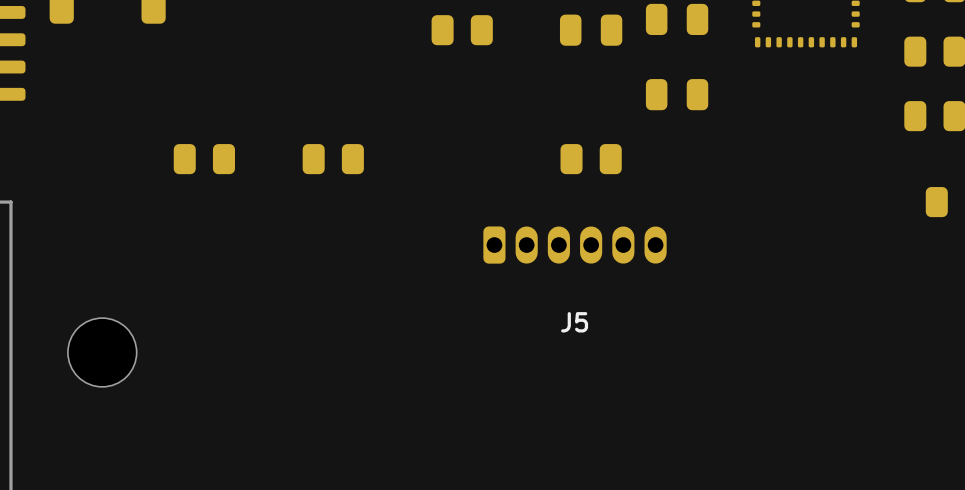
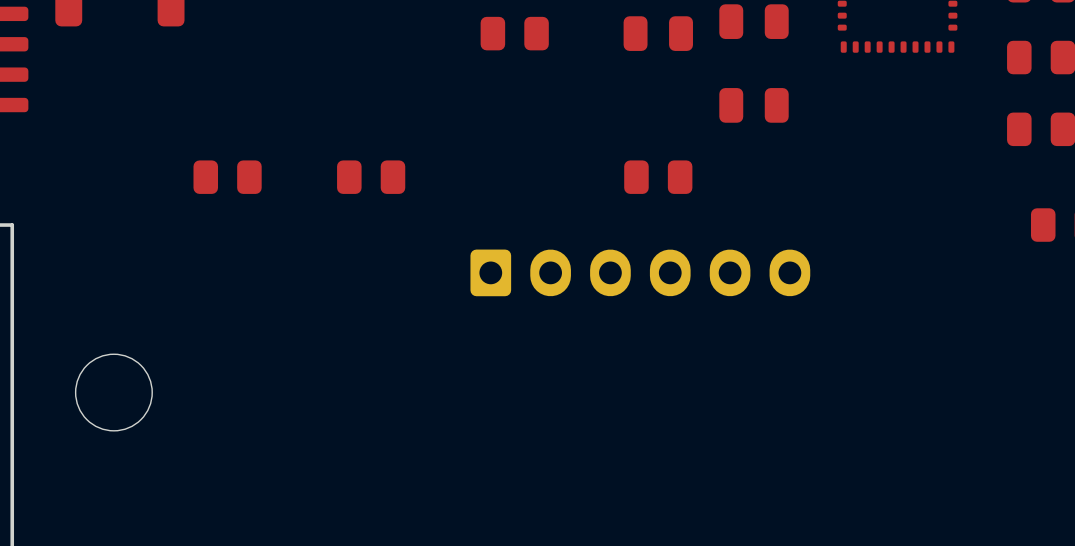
J5: (575, 245) -> none
part: none -> (640, 272)

